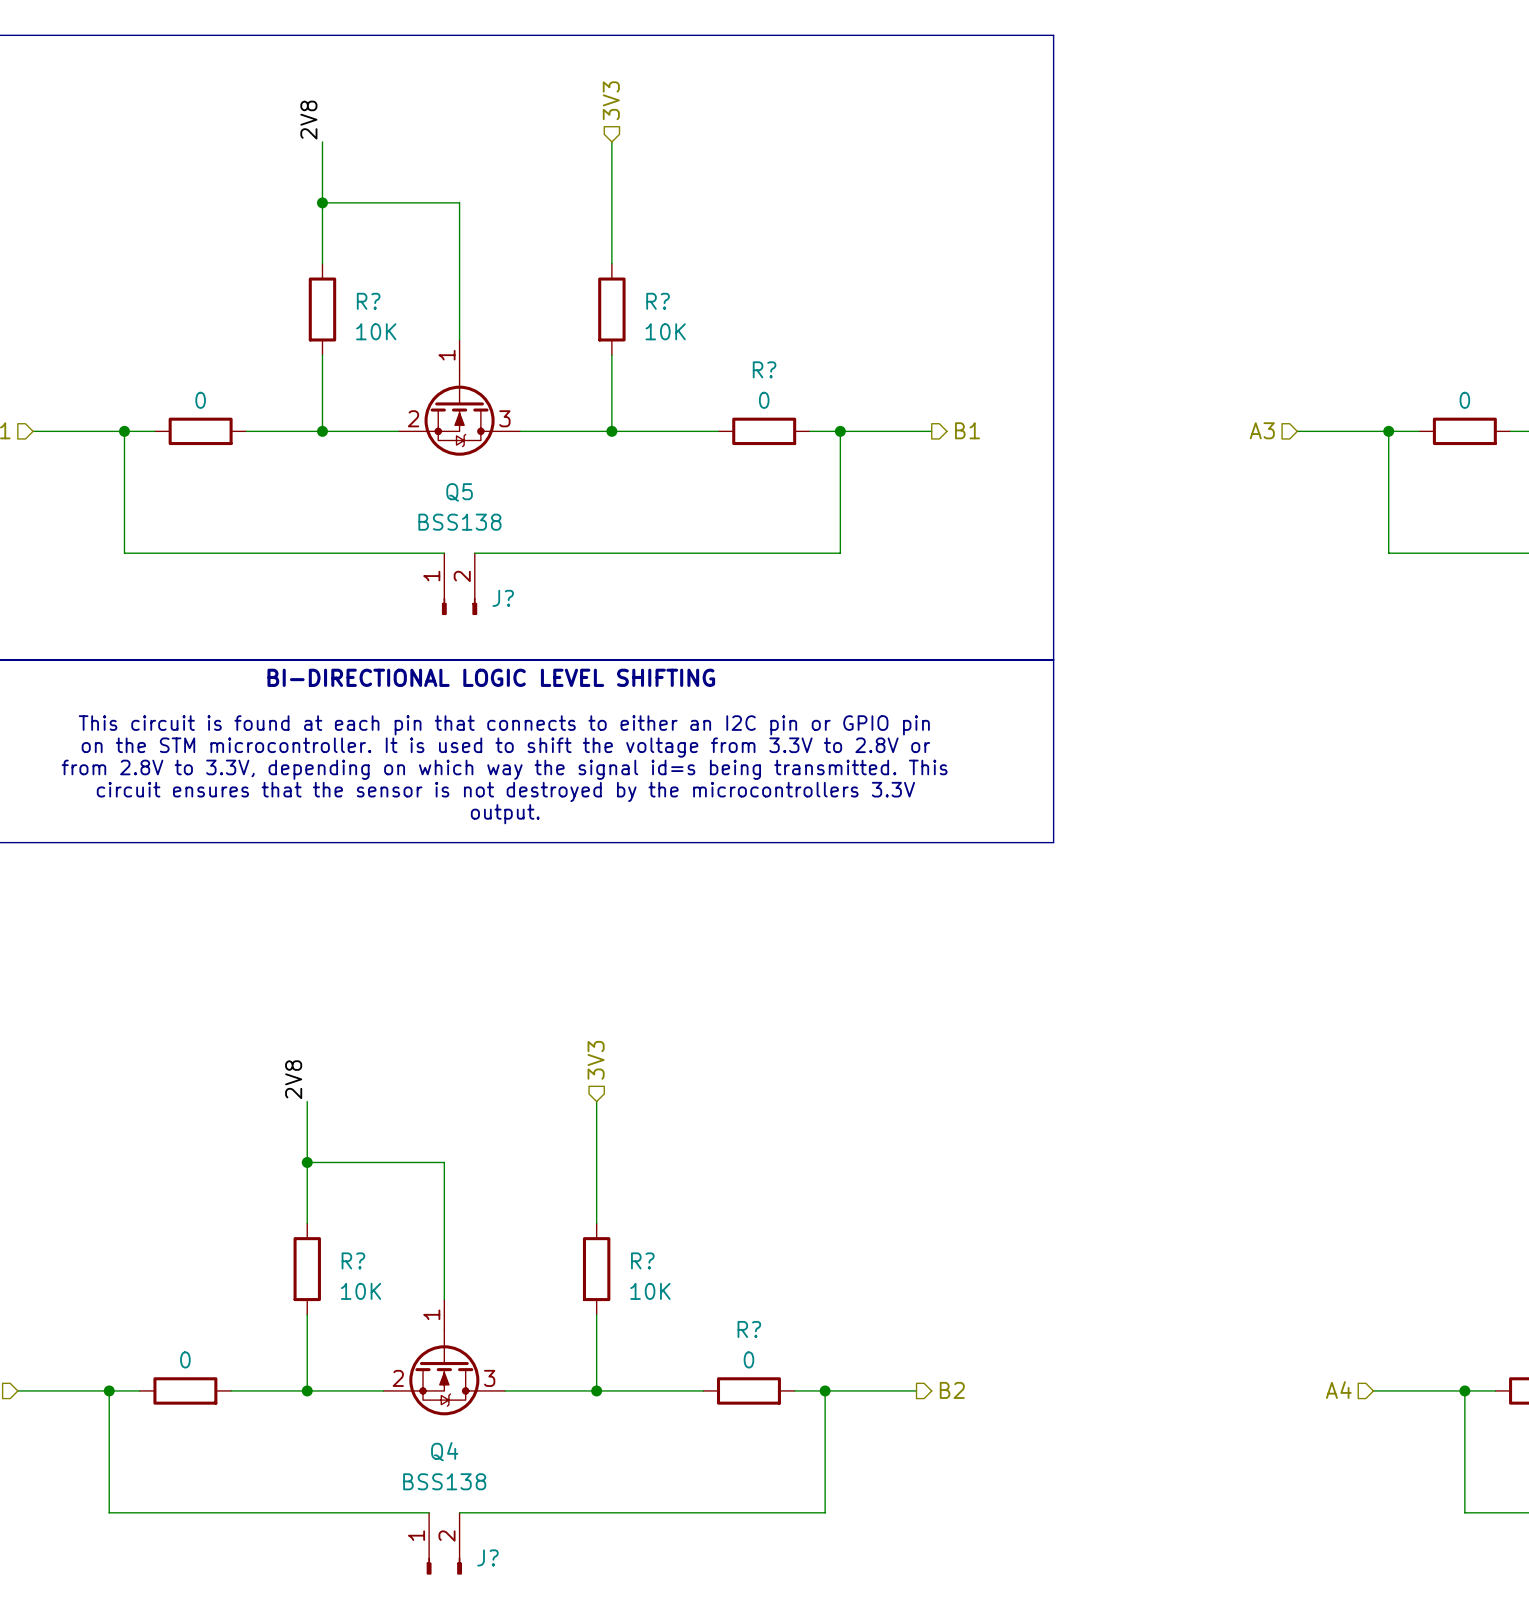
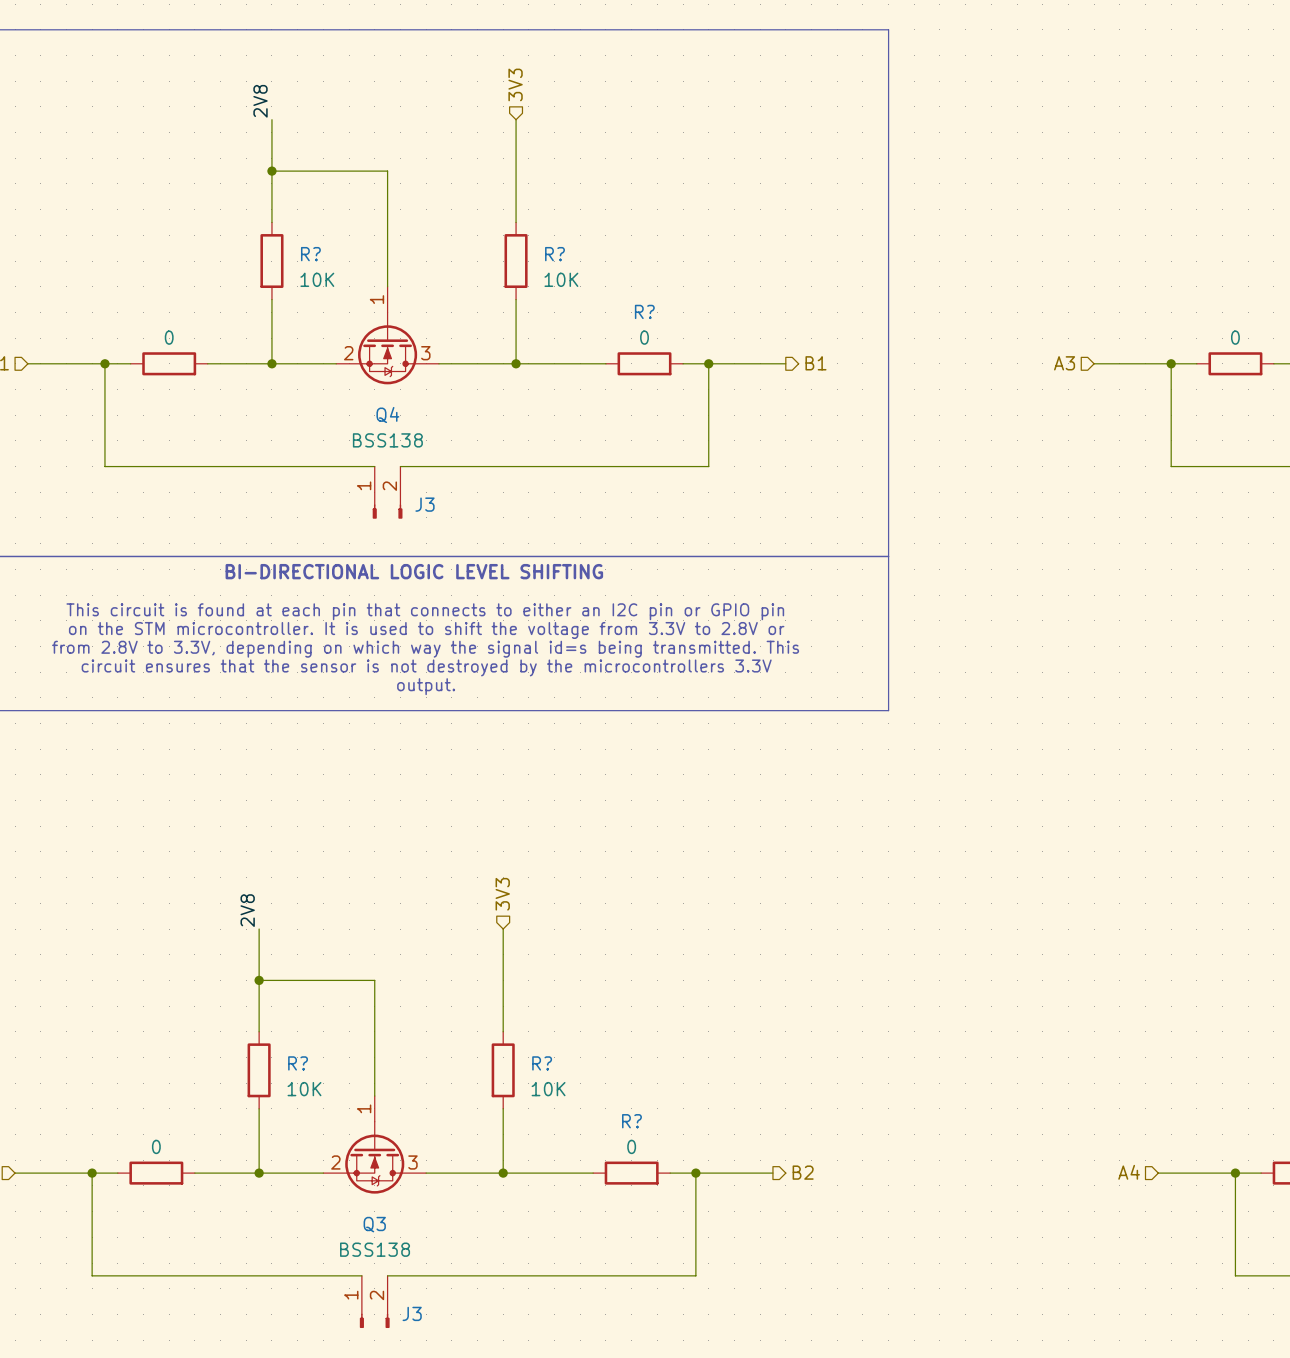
Q5 name: Q5 (459, 492) -> Q4 (387, 415)
J? name: J? (503, 598) -> J3 (424, 504)
Q4 name: Q4 (444, 1451) -> Q3 (374, 1224)
J? name: J? (487, 1557) -> J3 (412, 1313)

